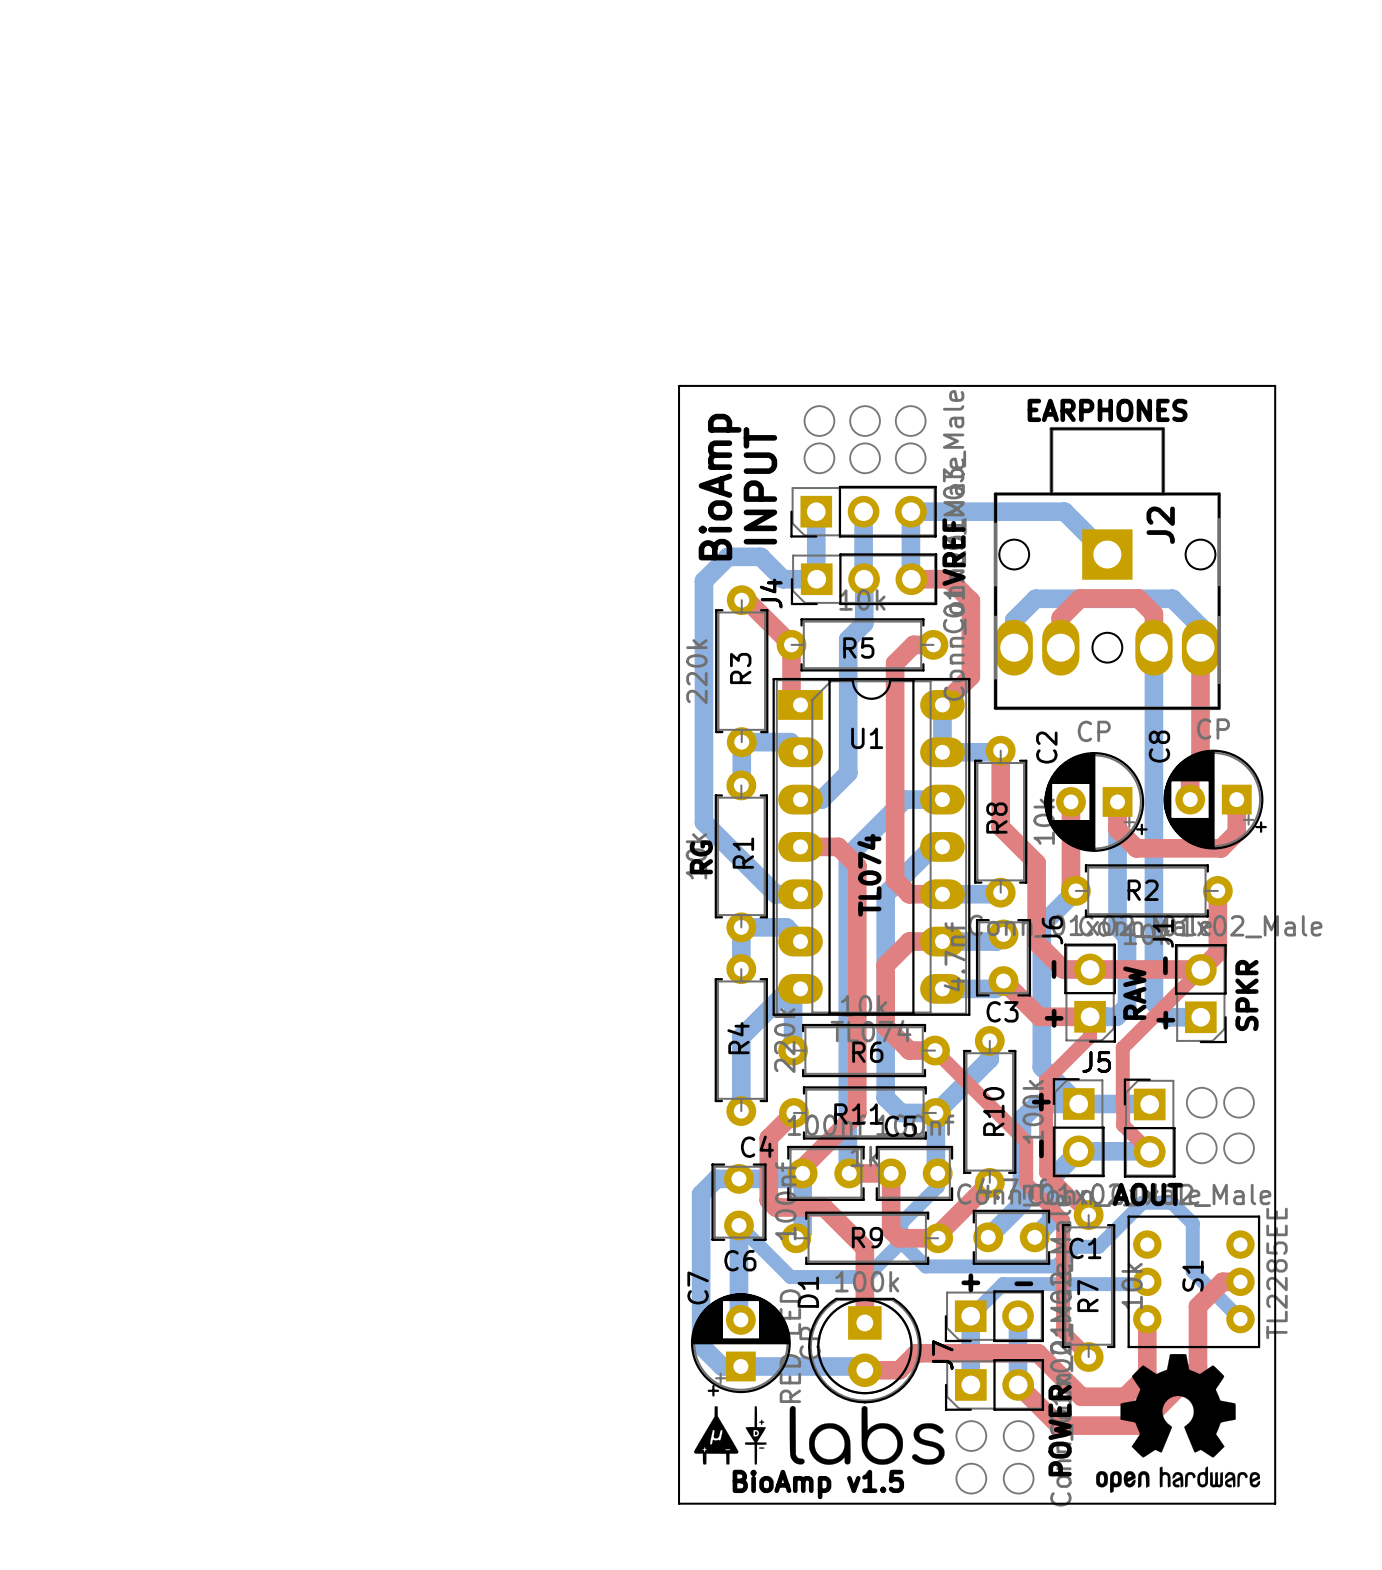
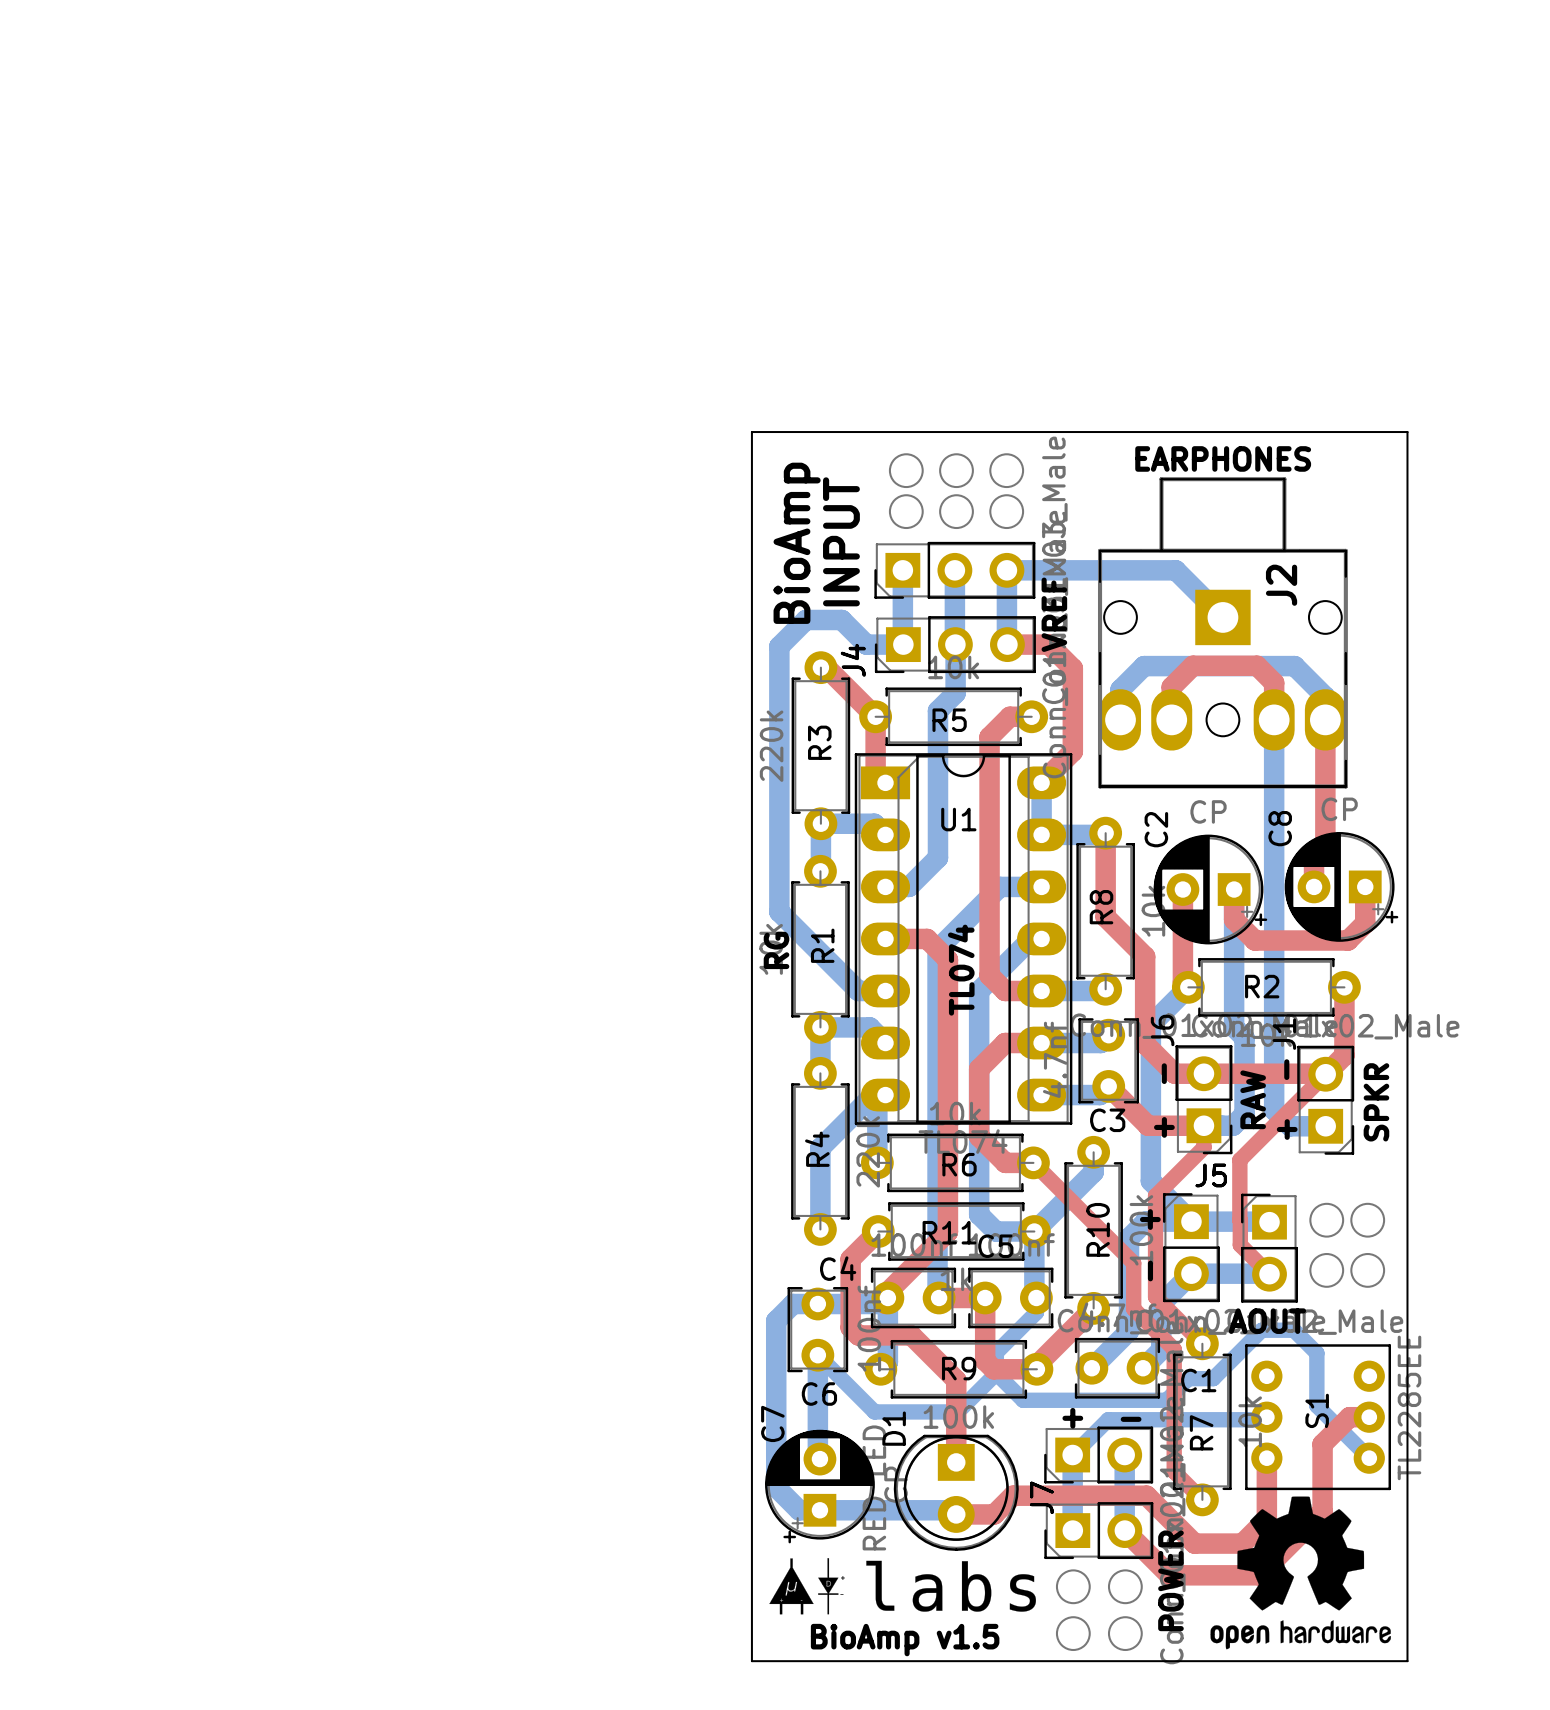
drawing shape: [693, 1405, 945, 1465] -> [769, 1558, 1036, 1615]

